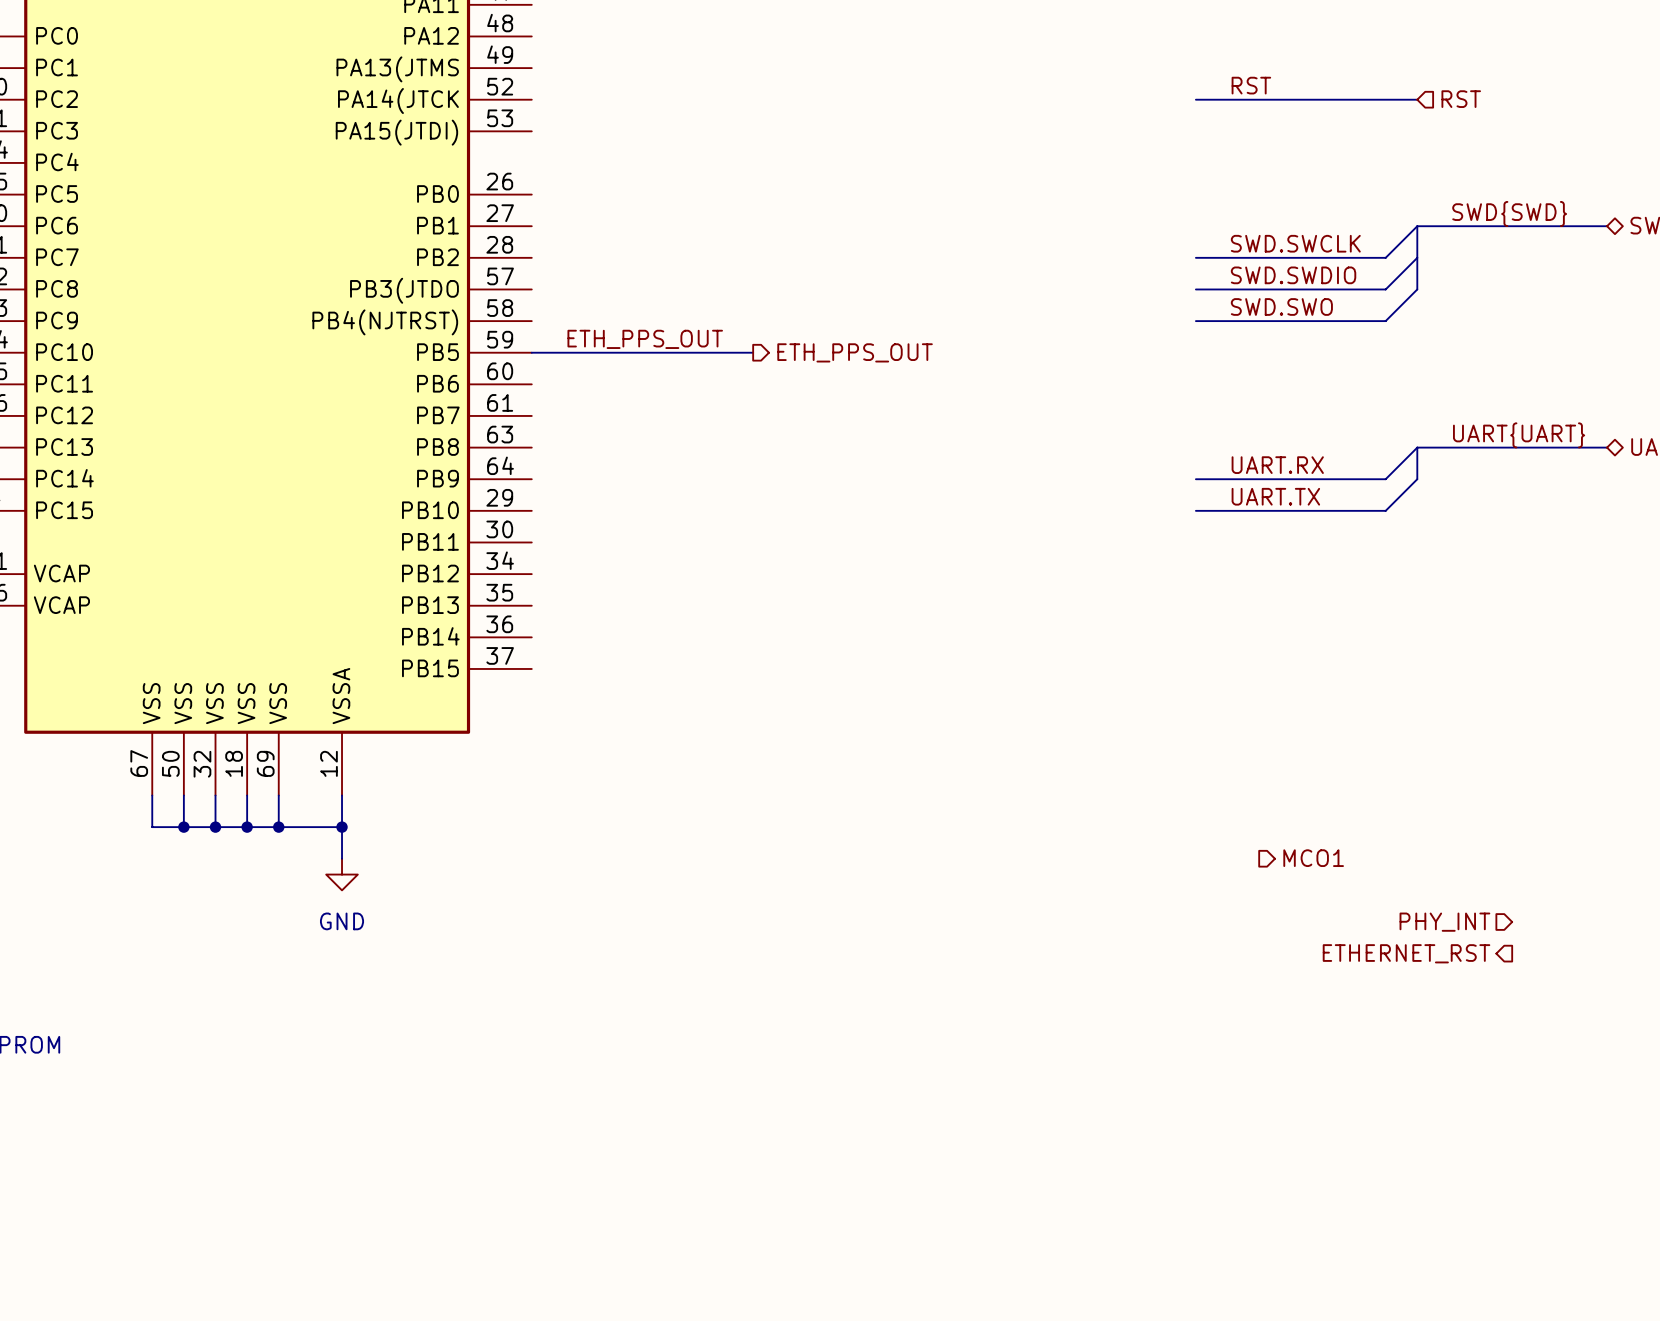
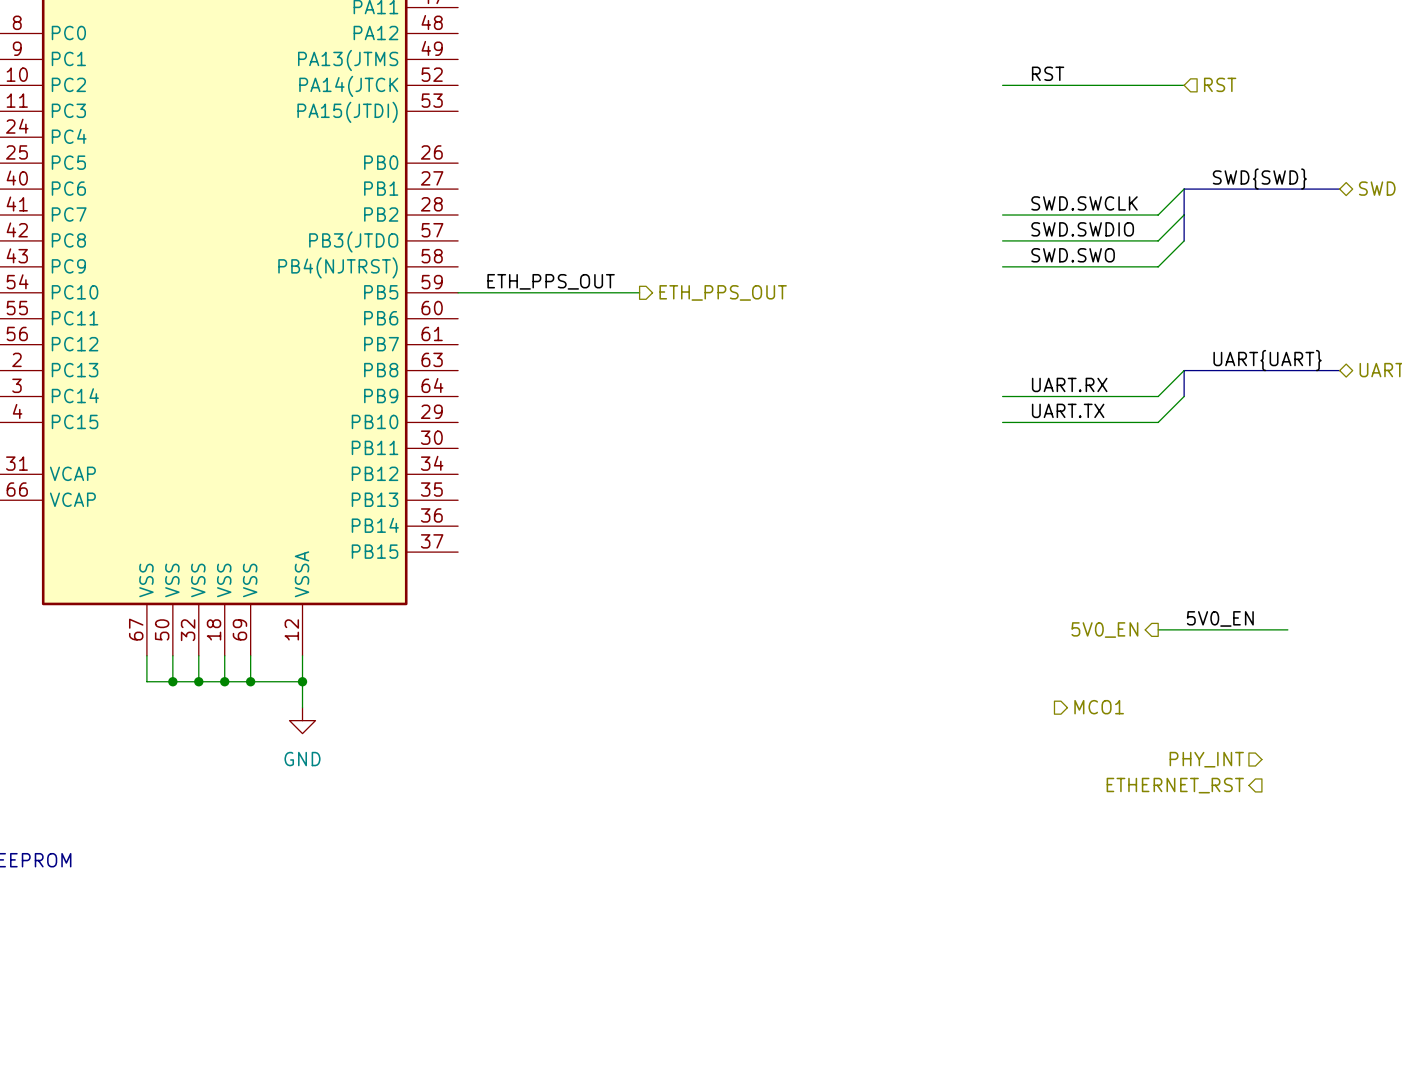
label: none -> 5V0_EN (1220, 618)
wire: none -> (1158, 629) (1287, 629)
hierarchical label: none -> 5V0_EN (1104, 630)

